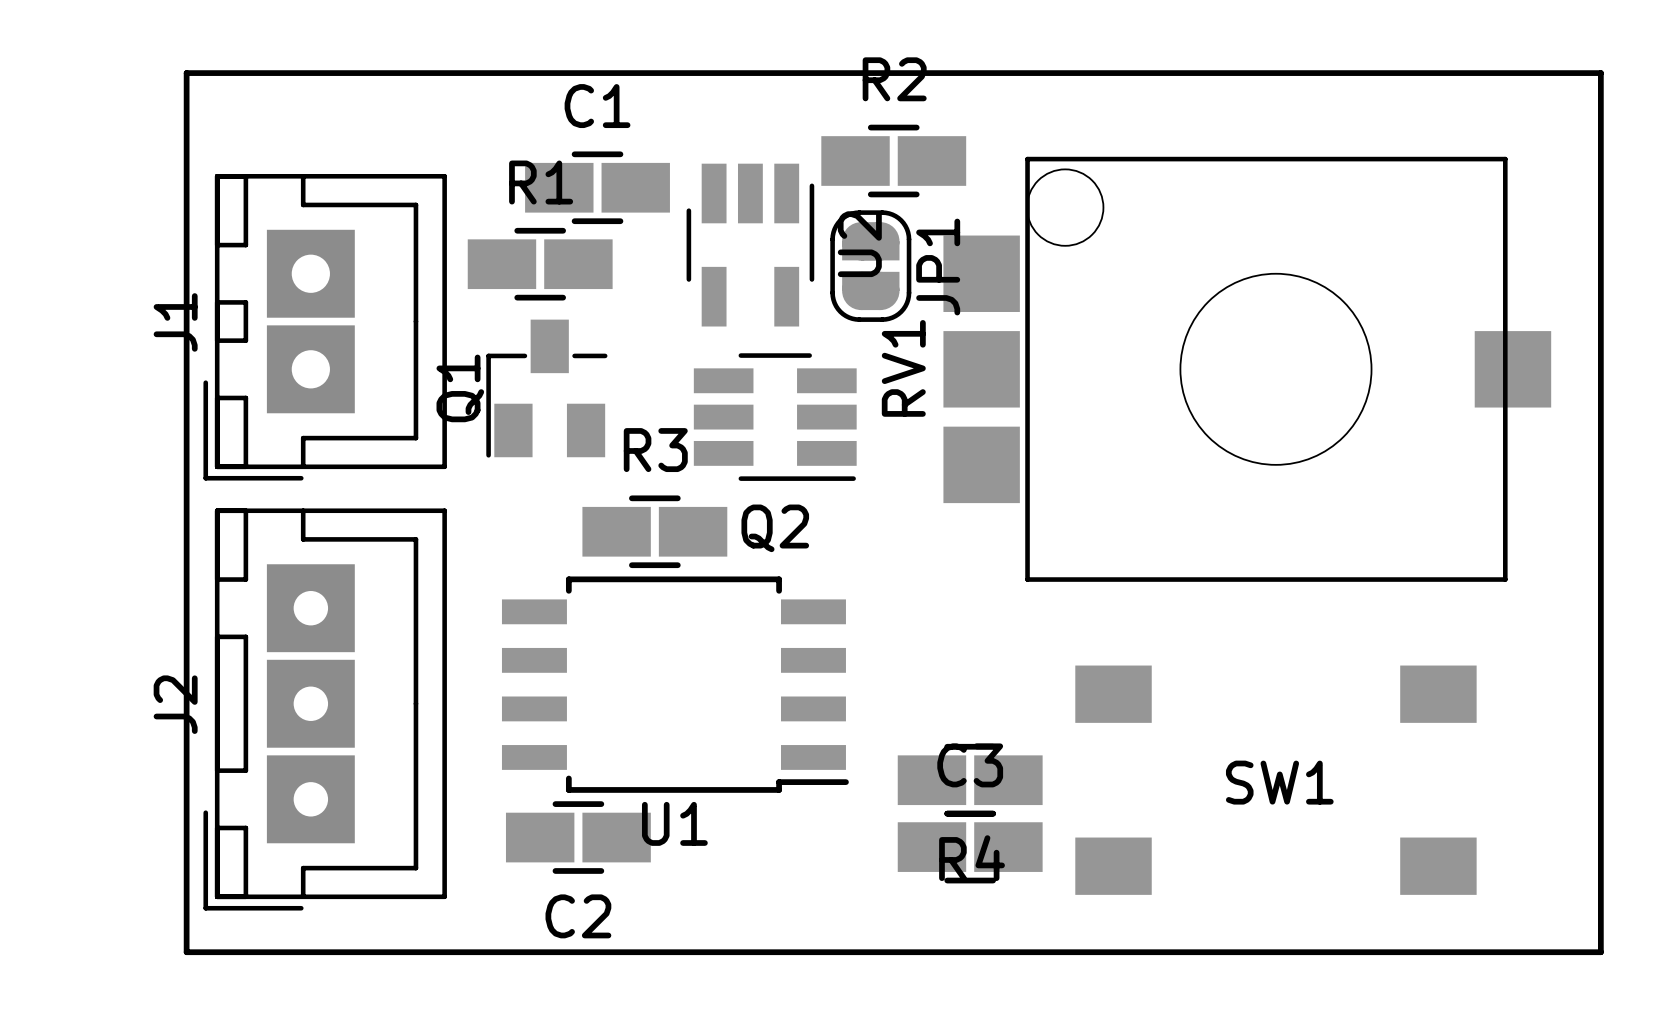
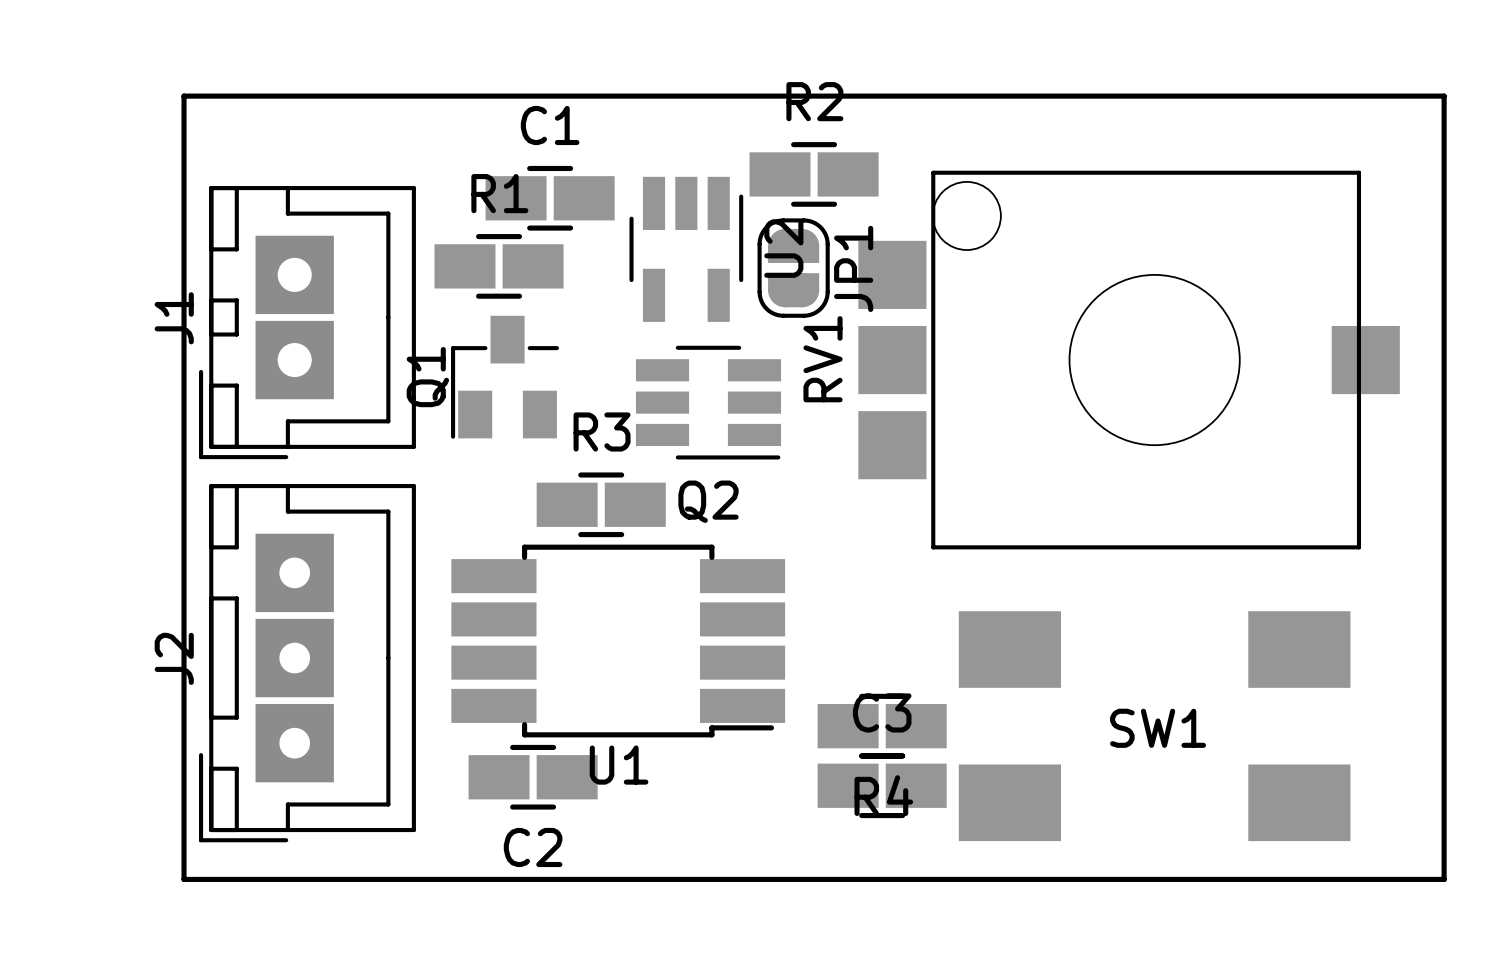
U1 footprint: [501, 576, 849, 793] -> [451, 544, 786, 738]
SW1 footprint: [1075, 665, 1477, 895] -> [958, 611, 1351, 842]

